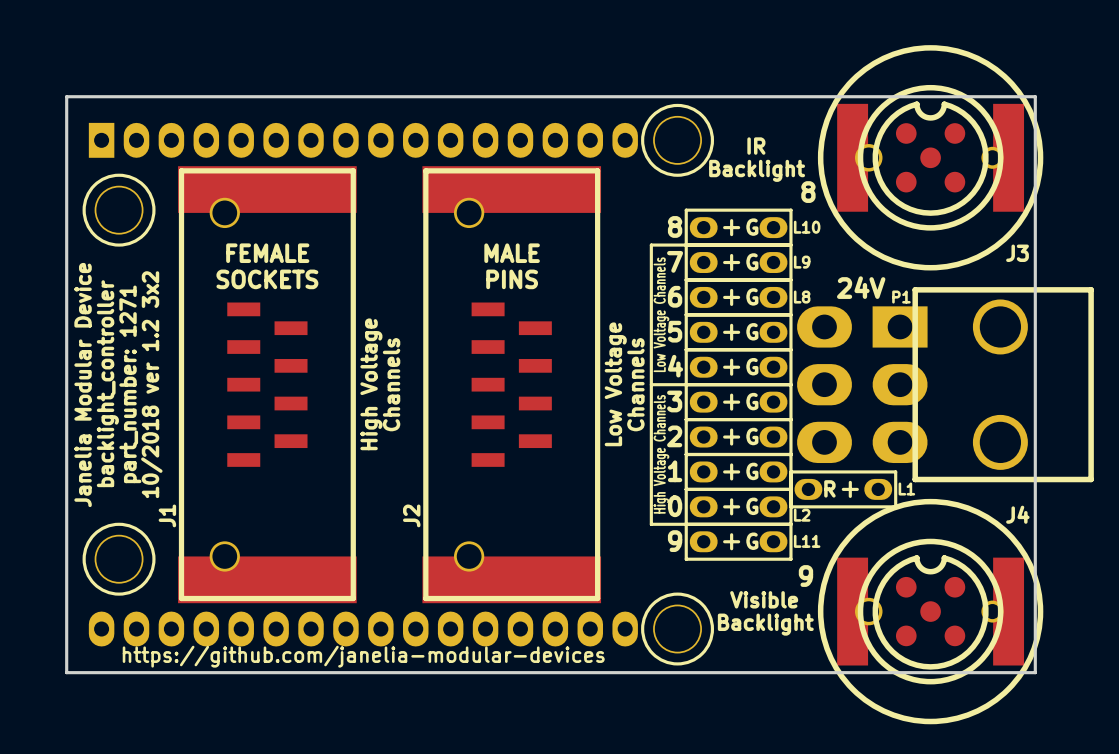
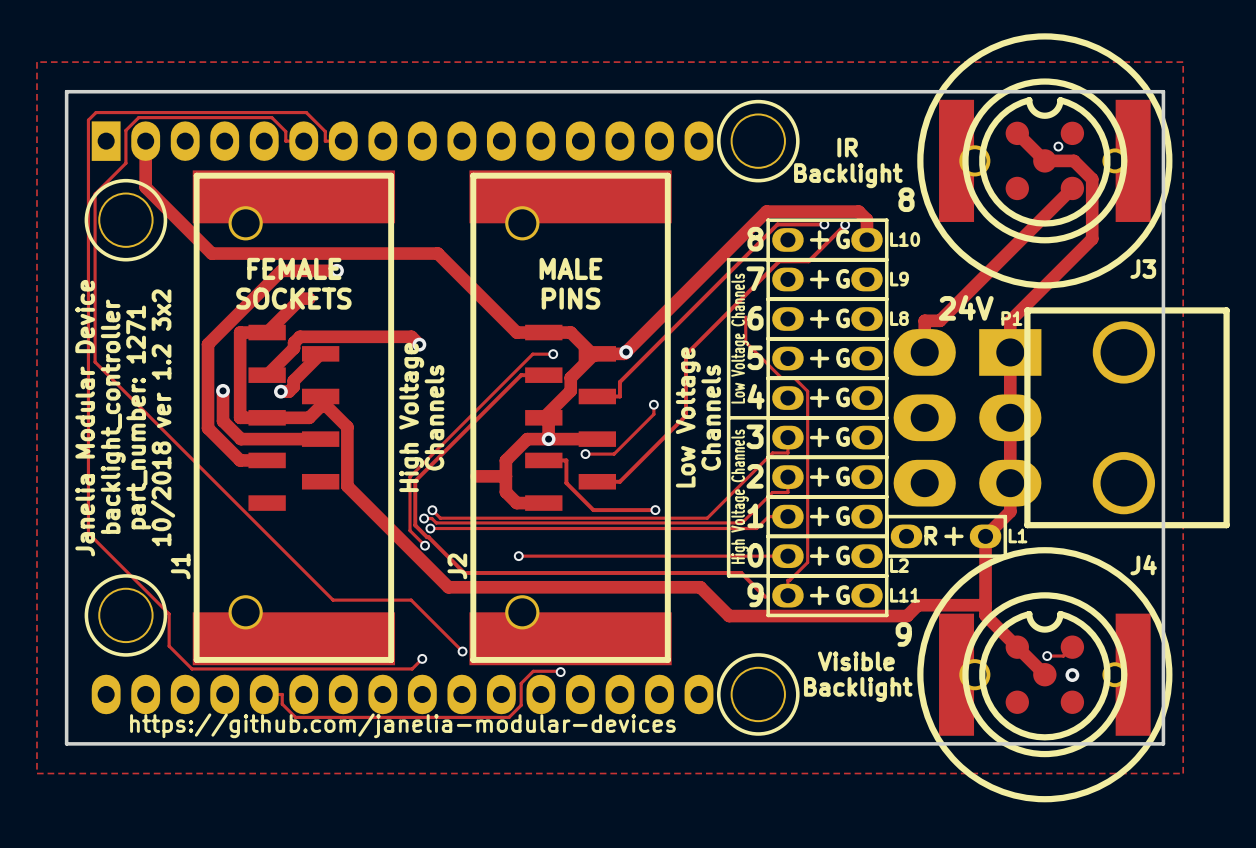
zone outline: none -> (36, 62) (36, 773) (1183, 773) (1183, 62) (36, 62)
track: none -> (1017, 133) (1044, 160) (1073, 160) (1092, 179) (1092, 238) (1010, 320) (1010, 511) (985, 536) (985, 615) (1044, 674)
track: none -> (145, 141) (145, 187) (211, 253) (437, 253) (516, 332) (570, 332) (593, 355)
track: none -> (303, 141) (285, 141) (285, 131) (271, 117) (138, 117) (125, 130) (125, 163) (95, 194) (95, 362) (333, 600) (411, 600) (462, 651)
track: none -> (343, 141) (325, 141) (325, 131) (306, 112) (96, 112) (88, 120) (88, 533) (169, 613) (169, 646) (191, 668) (412, 668) (422, 658)
via: none -> (1058, 146)
track: none -> (1072, 188) (940, 320) (924, 320) (924, 352)
track: none -> (824, 224) (777, 224) (619, 382) (619, 396) (597, 396)
via: none -> (824, 224)
track: none -> (845, 224) (808, 261) (779, 261) (685, 354) (685, 415) (619, 481) (597, 481)
via: none -> (845, 224)
track: none -> (866, 239) (866, 219) (858, 211) (766, 211) (624, 353) (593, 355)
track: none -> (336, 270) (281, 270) (208, 344) (208, 428) (240, 460) (267, 460)
via: none -> (336, 270)
track: none -> (309, 298) (301, 298) (267, 332) (240, 332) (240, 417) (309, 417) (320, 406)
track: none -> (745, 317) (745, 342) (781, 378) (794, 378) (807, 391) (807, 562) (787, 580) (787, 595)
track: none -> (419, 344) (411, 336) (300, 336) (294, 342) (294, 348) (267, 375)
via: none -> (419, 344)
via: none -> (626, 352)
track: none -> (320, 353) (293, 380) (293, 386) (288, 391) (280, 391)
track: none -> (553, 354) (532, 354) (410, 476) (410, 530) (425, 545)
via: none -> (553, 354)
track: none -> (593, 355) (570, 377) (570, 390) (543, 417) (548, 422) (548, 439)
track: none -> (543, 375) (521, 375) (415, 481) (415, 525) (464, 572) (741, 572) (765, 596)
track: none -> (223, 390) (223, 421) (240, 439) (320, 439)
via: none -> (223, 390)
via: none -> (280, 391)
track: none -> (653, 404) (653, 414) (614, 454) (585, 454)
via: none -> (653, 404)
track: none -> (320, 406) (326, 406) (347, 427) (347, 486) (448, 587) (700, 587) (729, 616) (907, 616) (917, 605) (985, 605)
track: none -> (787, 437) (787, 452) (772, 452) (707, 518) (440, 518) (432, 510)
via: none -> (548, 439)
track: none -> (597, 439) (527, 439) (505, 460) (505, 492) (516, 503) (543, 503)
via: none -> (585, 454)
track: none -> (543, 460) (566, 460) (566, 483) (593, 510) (655, 510)
track: none -> (476, 476) (505, 476)
track: none -> (787, 477) (787, 492) (772, 492) (742, 522) (436, 522) (431, 518) (424, 518)
via: none -> (432, 510)
via: none -> (655, 510)
track: none -> (787, 516) (768, 516) (756, 528) (430, 528)
via: none -> (424, 518)
via: none -> (430, 528)
via: none -> (425, 545)
track: none -> (518, 556) (787, 556)
via: none -> (518, 556)
track: none -> (1072, 647) (1063, 656) (1047, 656)
via: none -> (462, 651)
via: none -> (1047, 656)
via: none -> (422, 658)
track: none -> (560, 672) (533, 671) (521, 683) (521, 705) (509, 717) (295, 717) (282, 704) (282, 694) (264, 694)
via: none -> (560, 672)
via: none -> (1072, 675)

